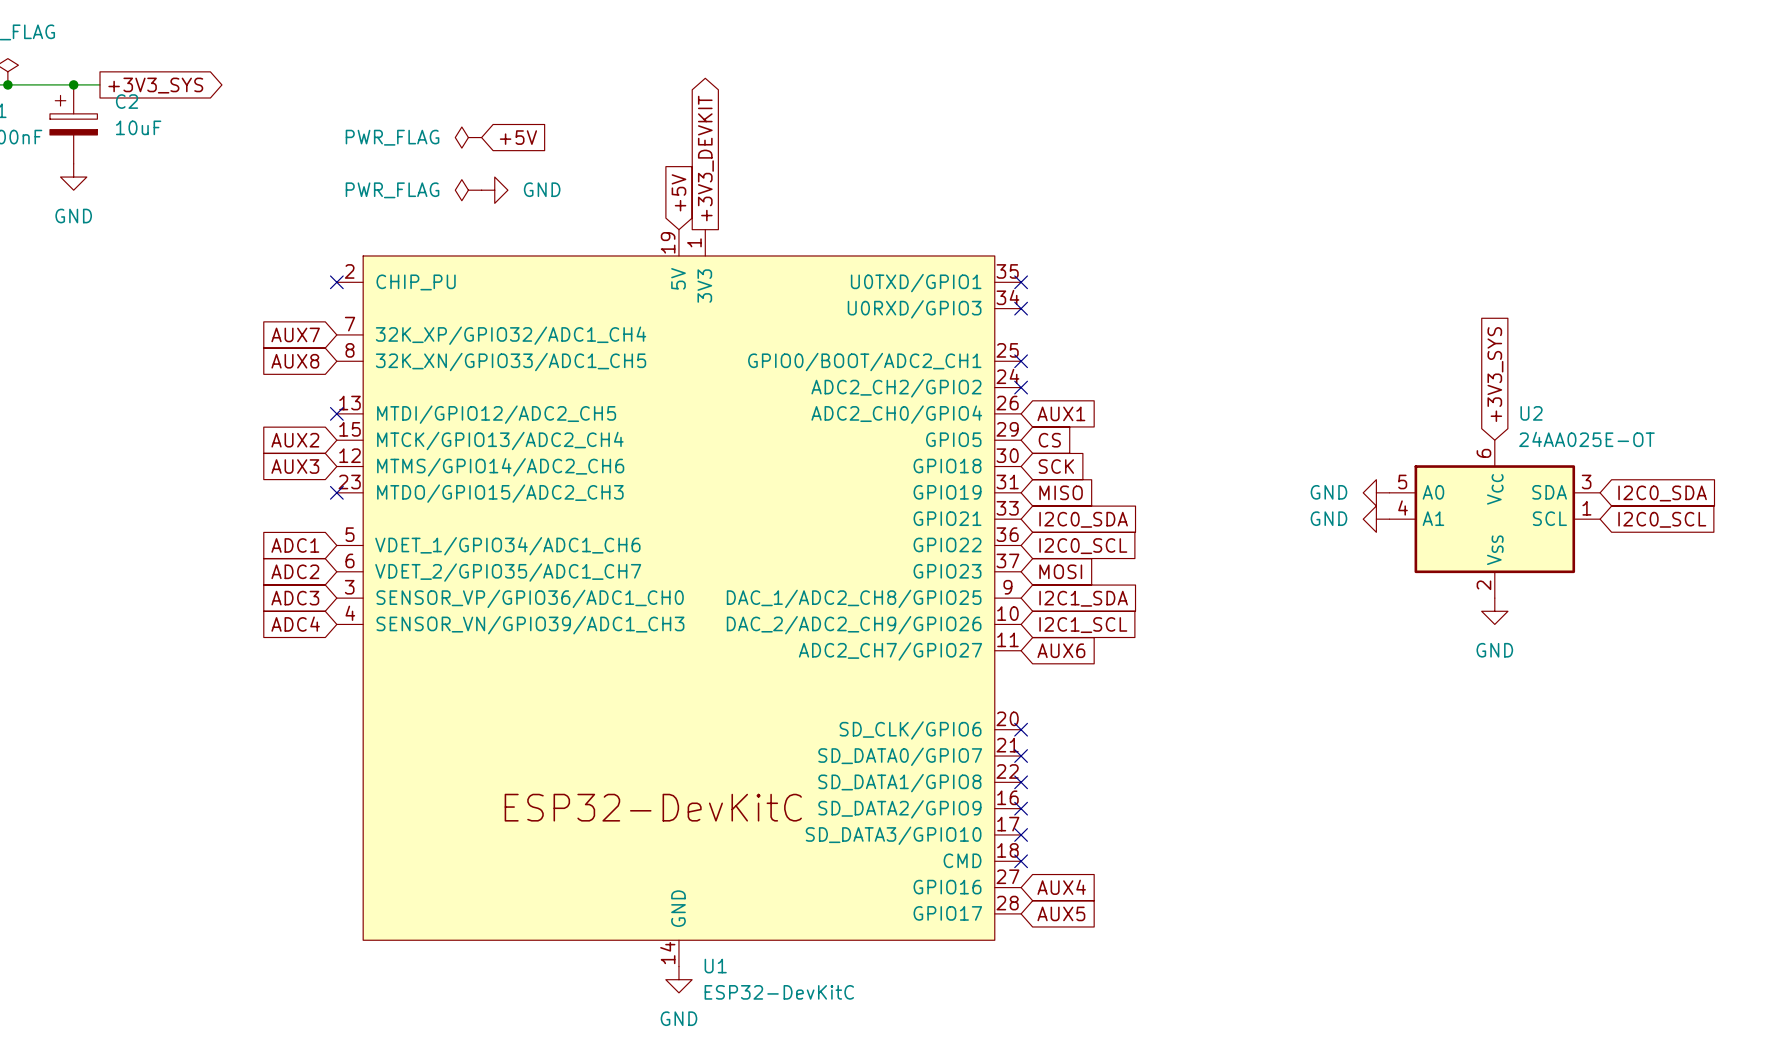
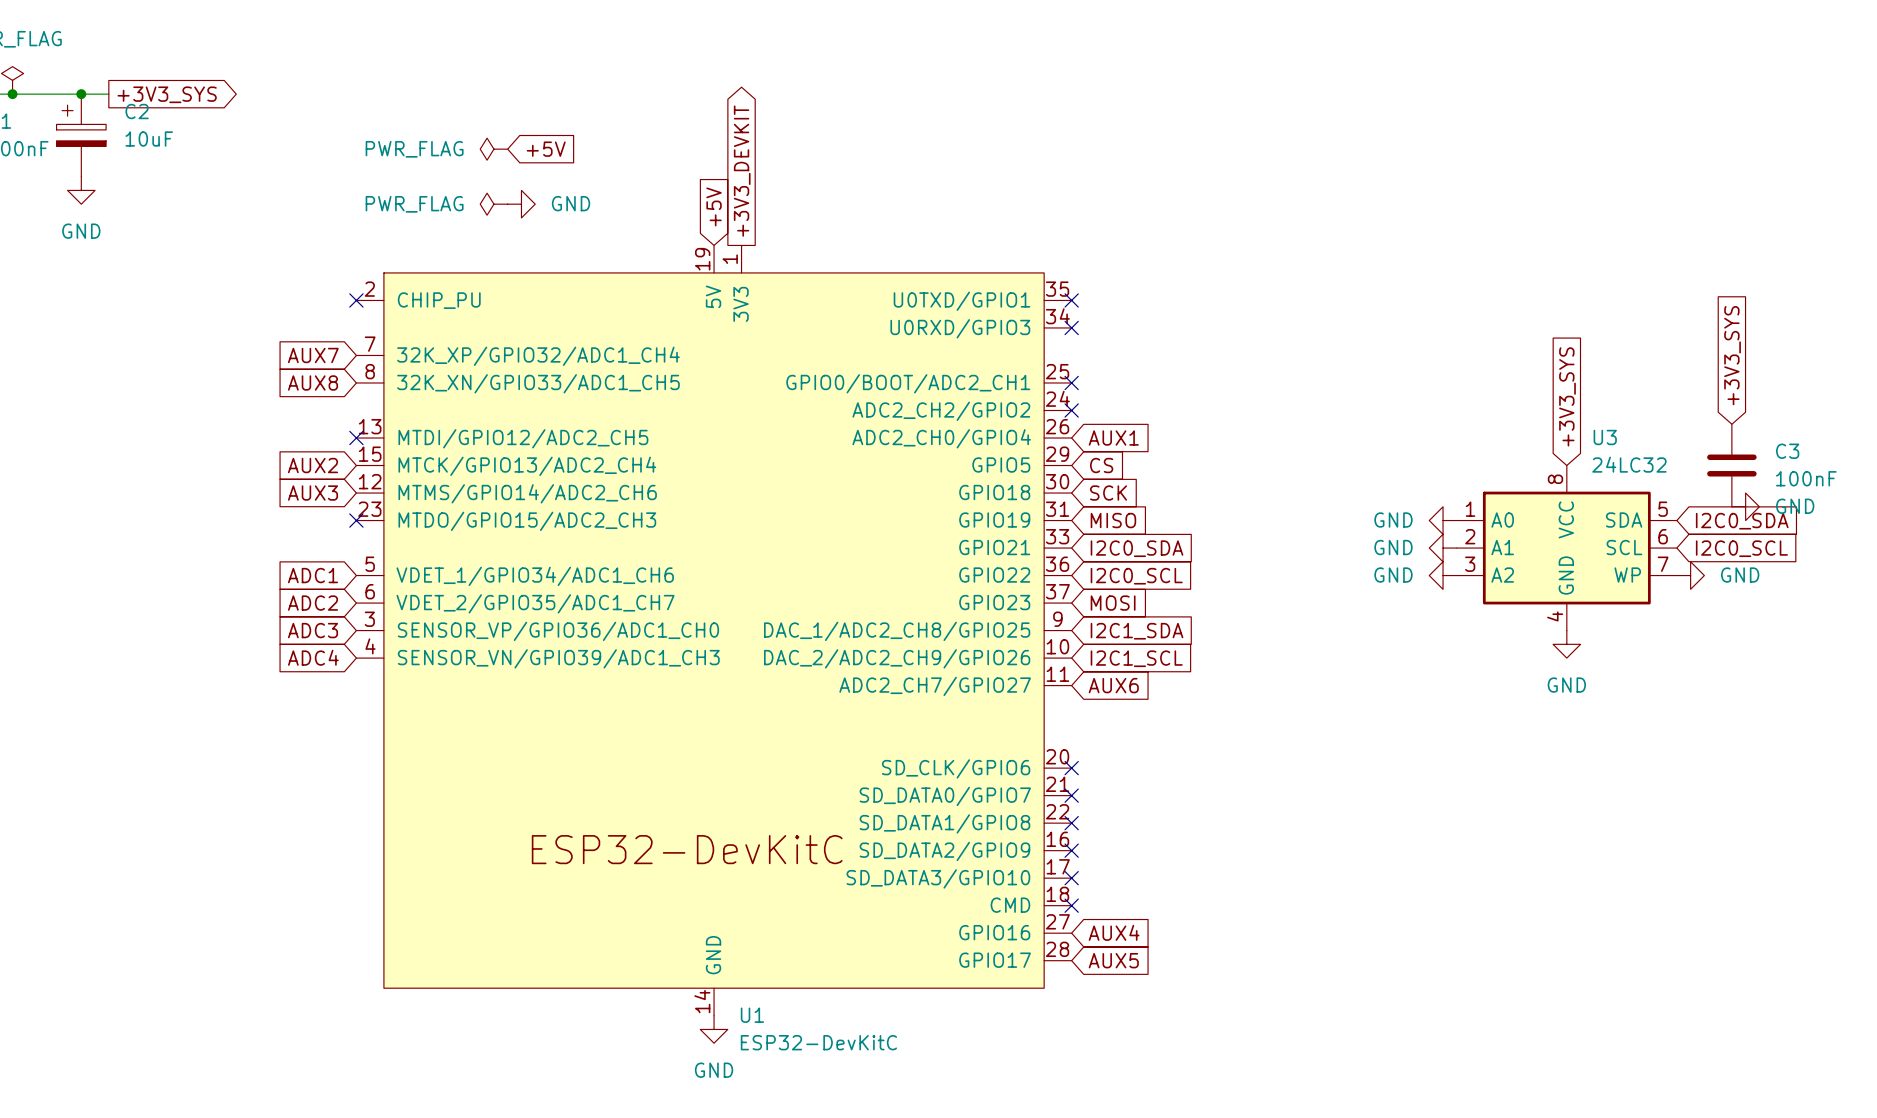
global label: none -> +3V3_SYS (1732, 355)
C3: none -> 100nF (1731, 465)
power symbol: none -> GND (1745, 506)
U2: 24AA025E-OT (1494, 519) -> none
U3: none -> 24LC32 (1566, 548)
power symbol: none -> GND (1443, 575)
power symbol: none -> GND (1690, 575)

